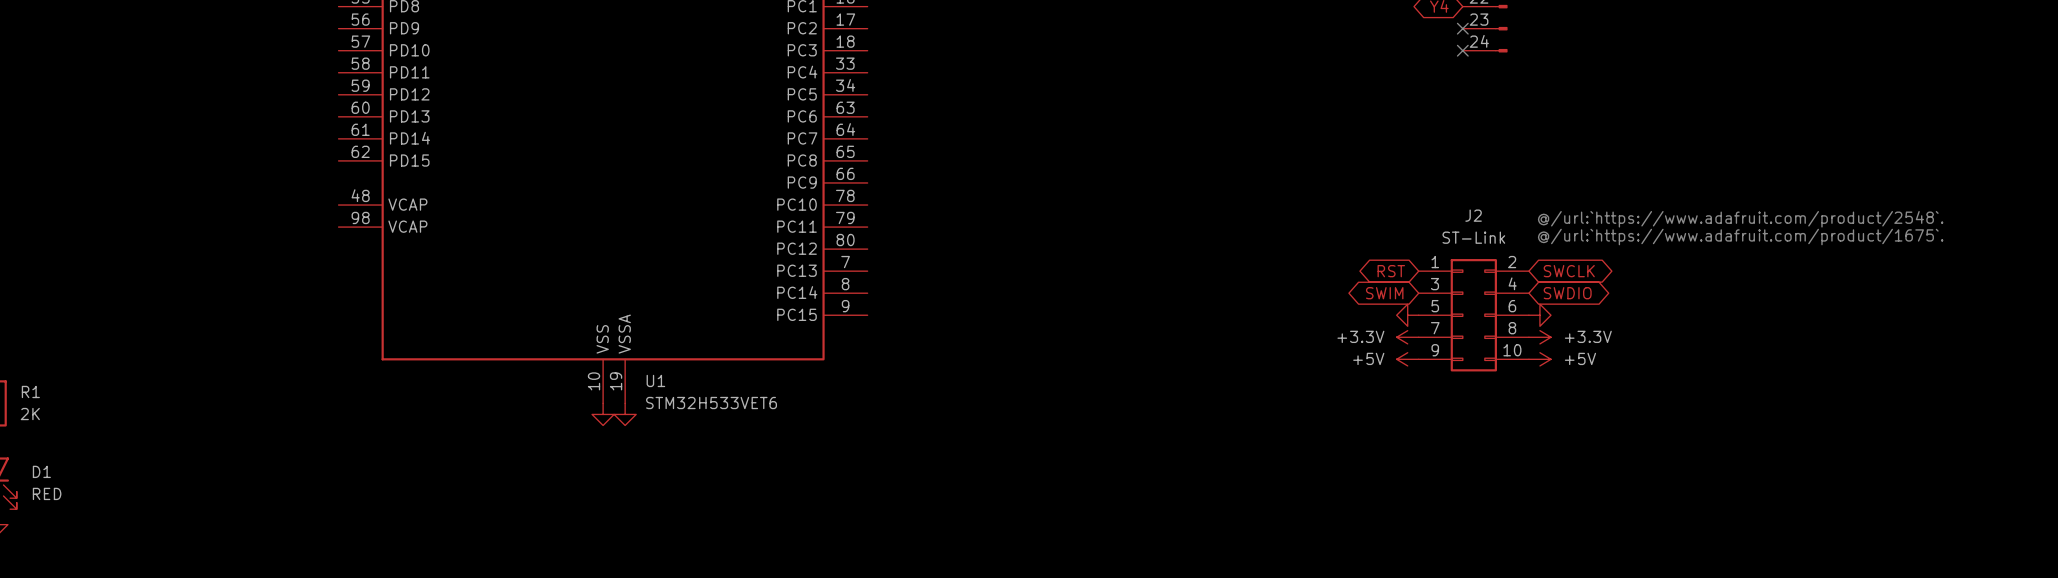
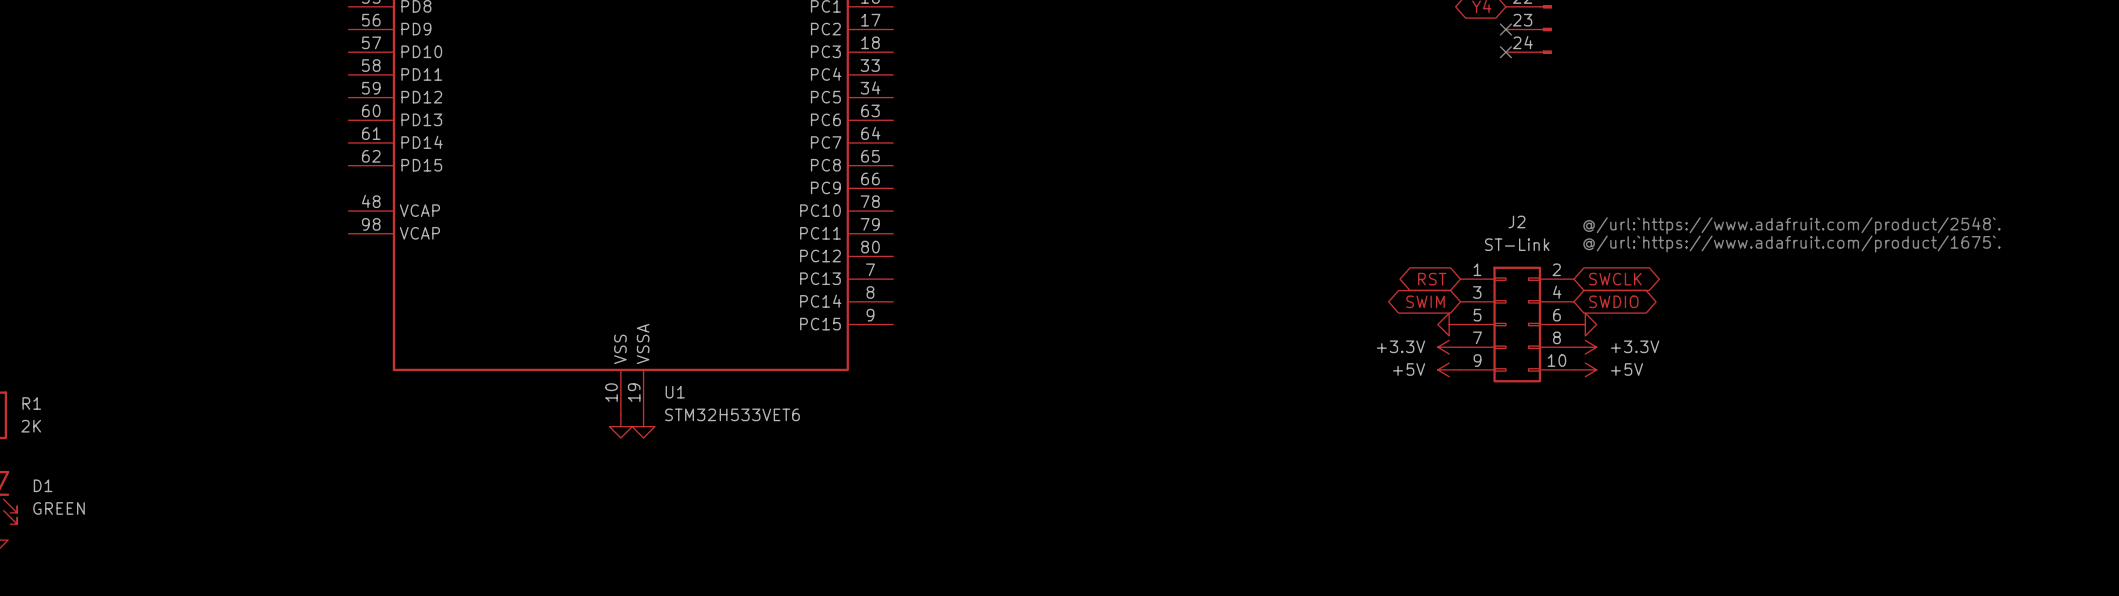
D1 value: RED (47, 493) -> GREEN (59, 508)

